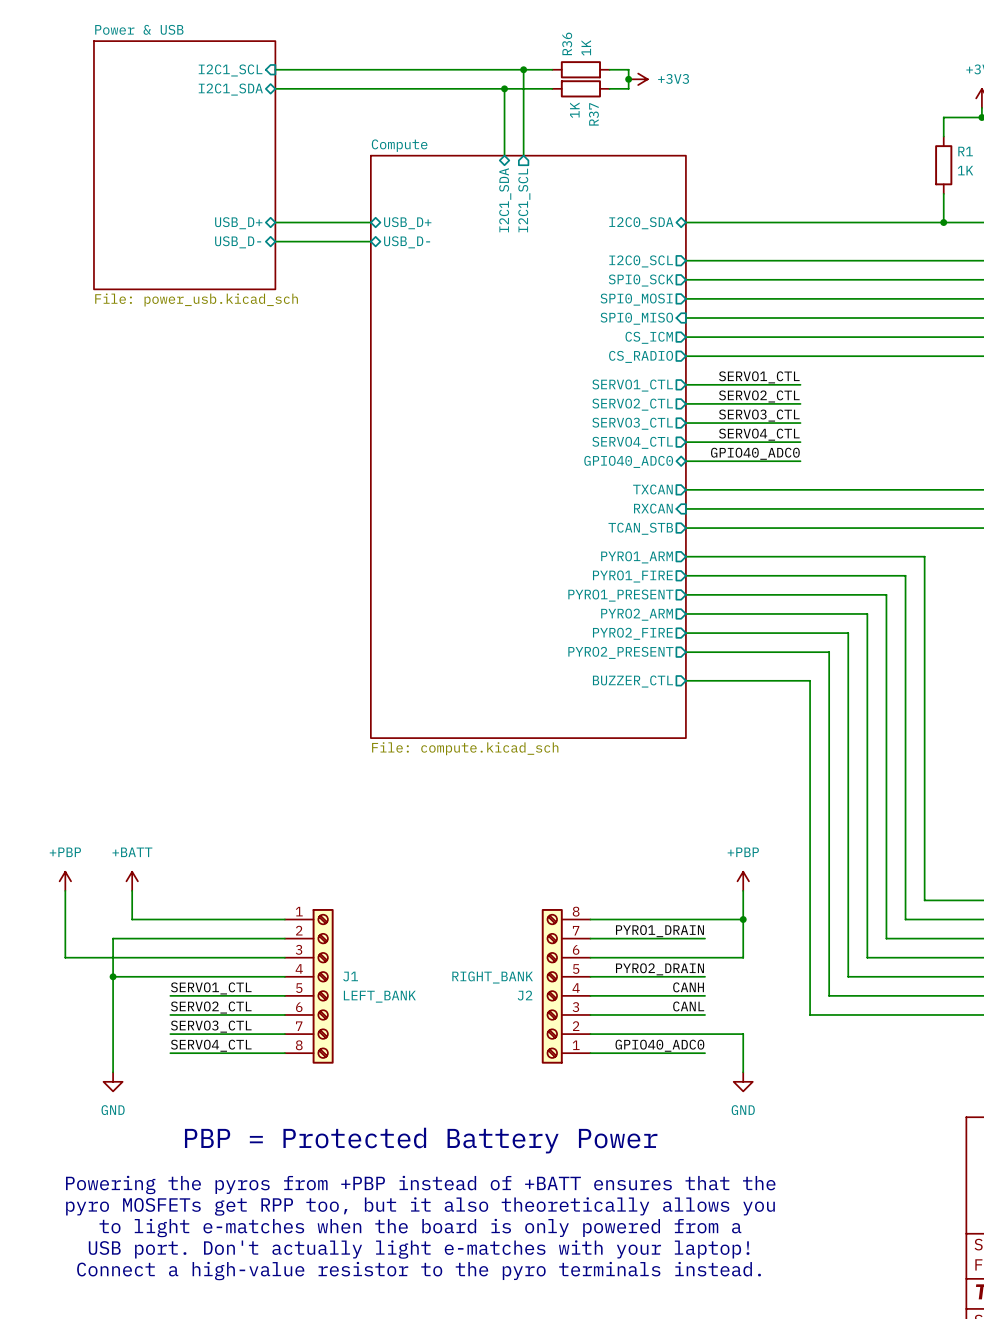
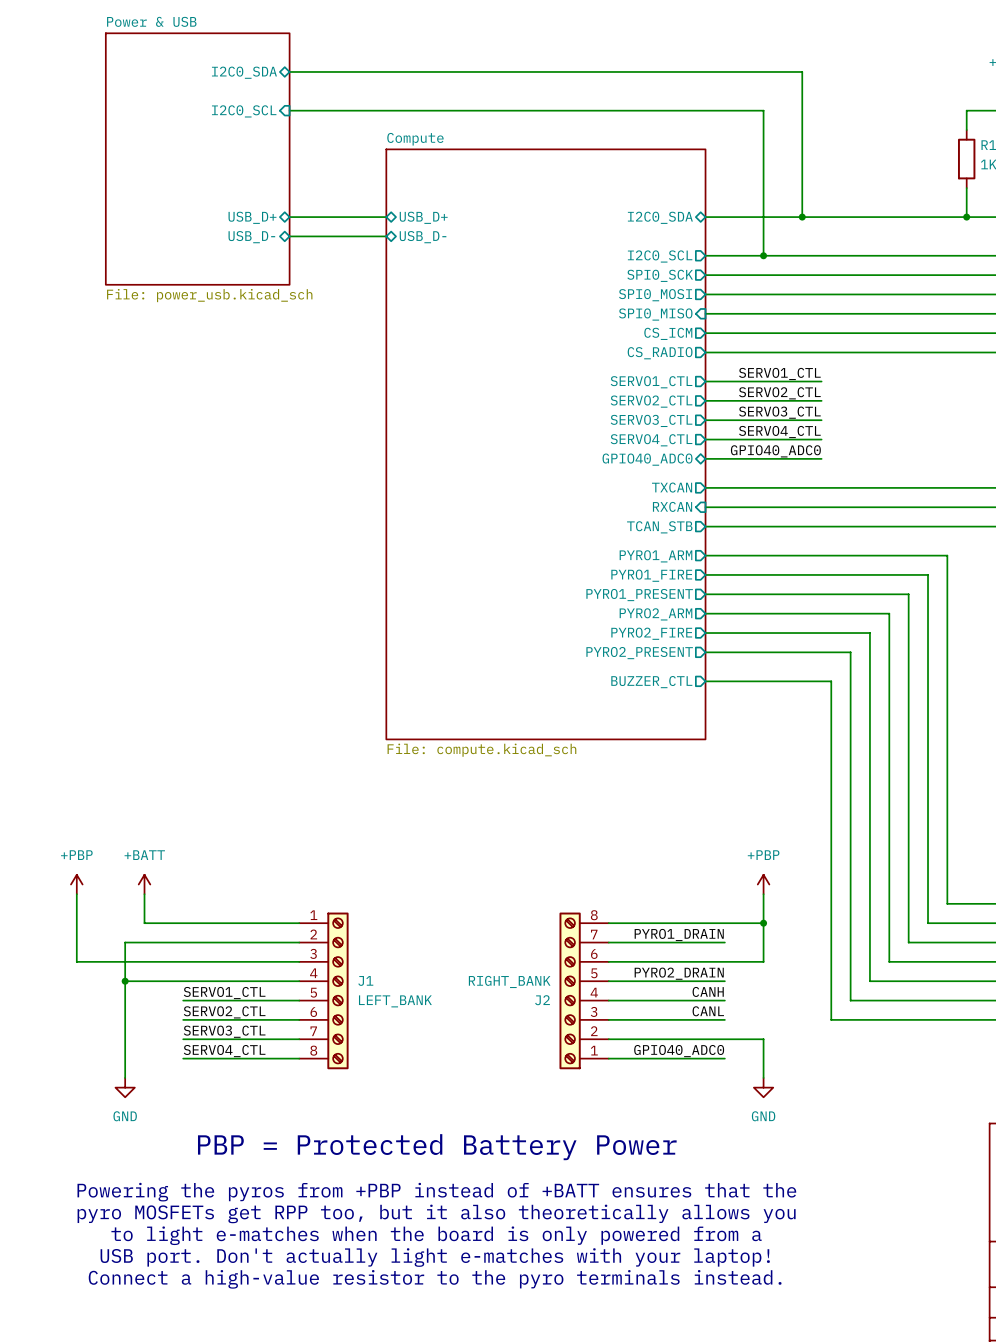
wire: (275, 69) (552, 69) -> none
wire: (523, 69) (523, 155) -> none
junction: (523, 69) -> none
R36: 1K (580, 69) -> none
wire: (609, 69) (628, 69) (628, 88) (609, 88) -> none
sheet pin: I2C1_SCL (230, 70) -> none
wire: none -> (289, 71) (802, 71) (802, 217)
junction: (628, 79) -> none
power symbol: +3V3 (638, 79) -> none
sheet pin: none -> I2C0_SDA (244, 72)
wire: (275, 88) (552, 88) -> none
wire: (504, 88) (504, 155) -> none
junction: (504, 88) -> none
R37: 1K (580, 88) -> none
sheet pin: I2C1_SDA (230, 89) -> none
wire: none -> (289, 110) (763, 110) (763, 255)
sheet pin: none -> I2C0_SCL (244, 111)
sheet pin: I2C1_SDA (505, 200) -> none
sheet pin: I2C1_SCL (524, 200) -> none
junction: none -> (802, 217)
junction: none -> (763, 255)

